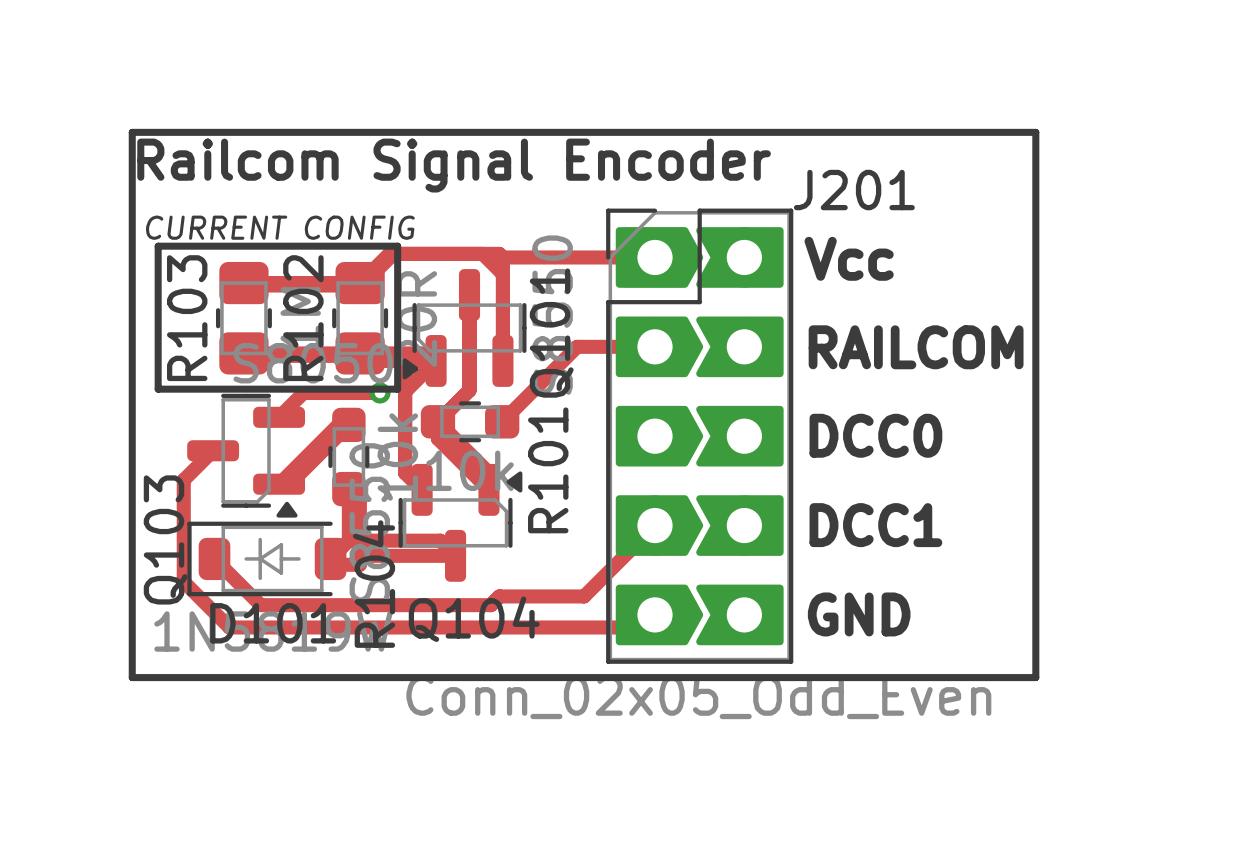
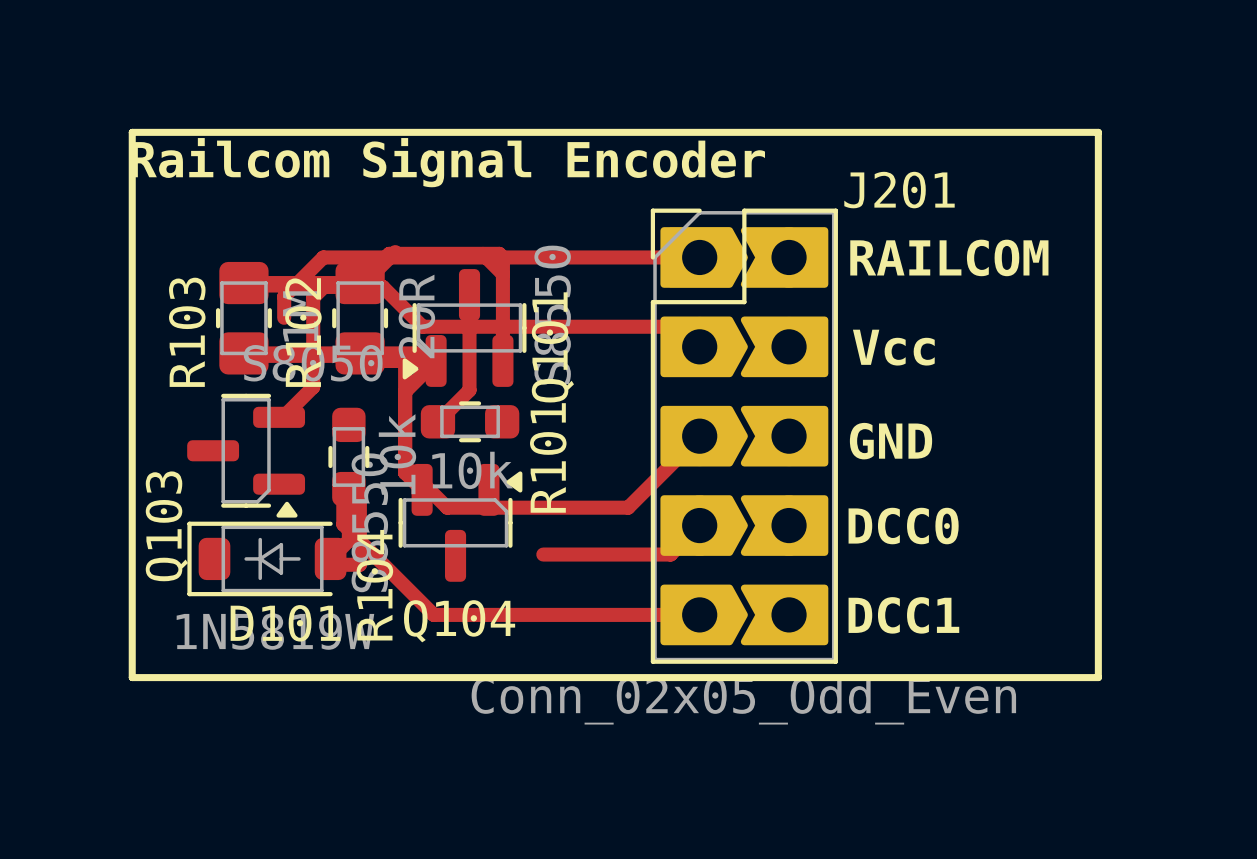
line: (1035, 132) (1035, 677) -> (1035, 132) (1098, 132) (1098, 677) (1035, 677)
text: CURRENT CONFIG (280, 227) -> none
line: (158, 246) (397, 246) (397, 389) (158, 389) (158, 246) -> none
track: none -> (502, 257) (323, 257) (284, 296) (284, 317)
text position: Vcc (849, 258) -> Vcc (893, 347)
track: (655, 346) (577, 346) (502, 421) -> none
track: none -> (699, 346) (679, 326) (422, 326) (382, 286) (323, 286) (313, 297) (313, 387) (284, 416)
text position: RAILCOM (916, 347) -> RAILCOM (949, 257)
track: (380, 392) (303, 392) (279, 417) -> none
via: (380, 392) -> none
track: (437, 421) (437, 438) (488, 489) (488, 472) (437, 421) -> none
track: (338, 424) (279, 484) (289, 484) (348, 424) (338, 424) -> none
text position: DCC0 (875, 435) -> DCC0 (903, 526)
track: none -> (699, 436) (628, 507) (447, 507) (409, 469)
J201 position: (699, 436) -> (744, 436)
track: (213, 450) (183, 480) (183, 581) (229, 627) (642, 627) (655, 614) -> none
track: none -> (343, 503) (343, 524) (433, 614) (699, 614)
track: (655, 525) (584, 596) (499, 596) (490, 605) (260, 605) (214, 558) -> none
track: none -> (699, 525) (670, 554) (543, 554)
text position: DCC1 (875, 525) -> DCC1 (903, 615)
track: (348, 540) (440, 540) (455, 555) (359, 555) -> none
text position: GND (859, 614) -> GND (891, 441)

